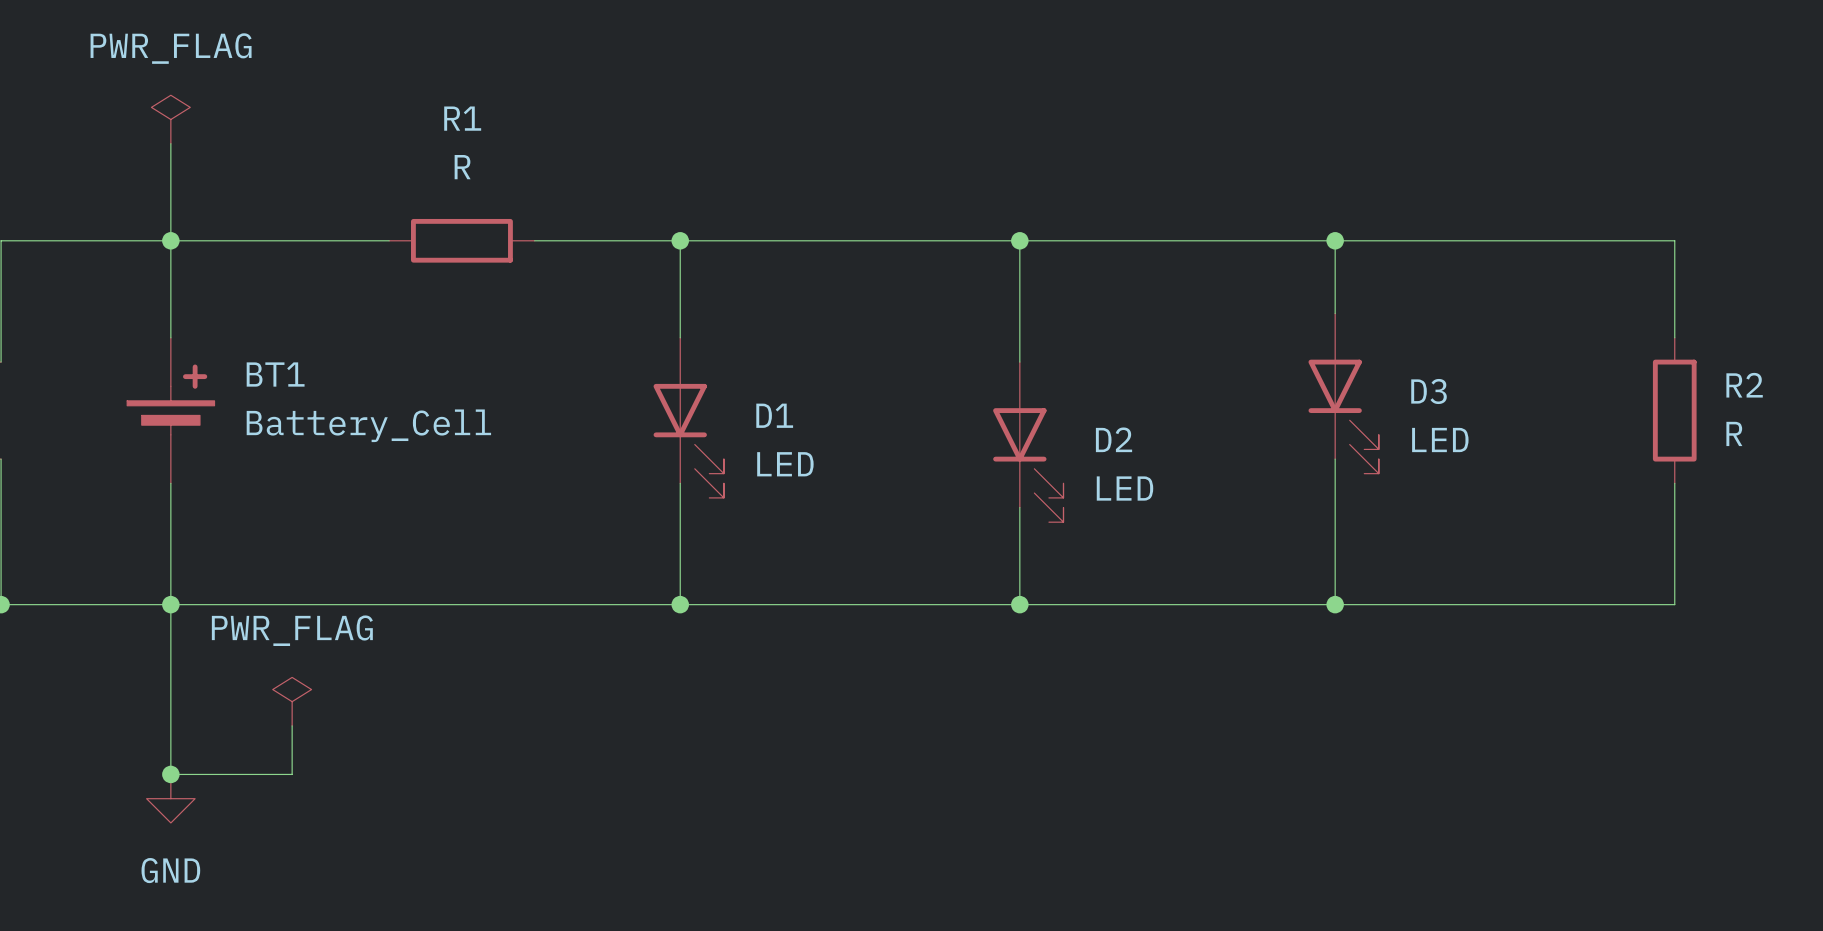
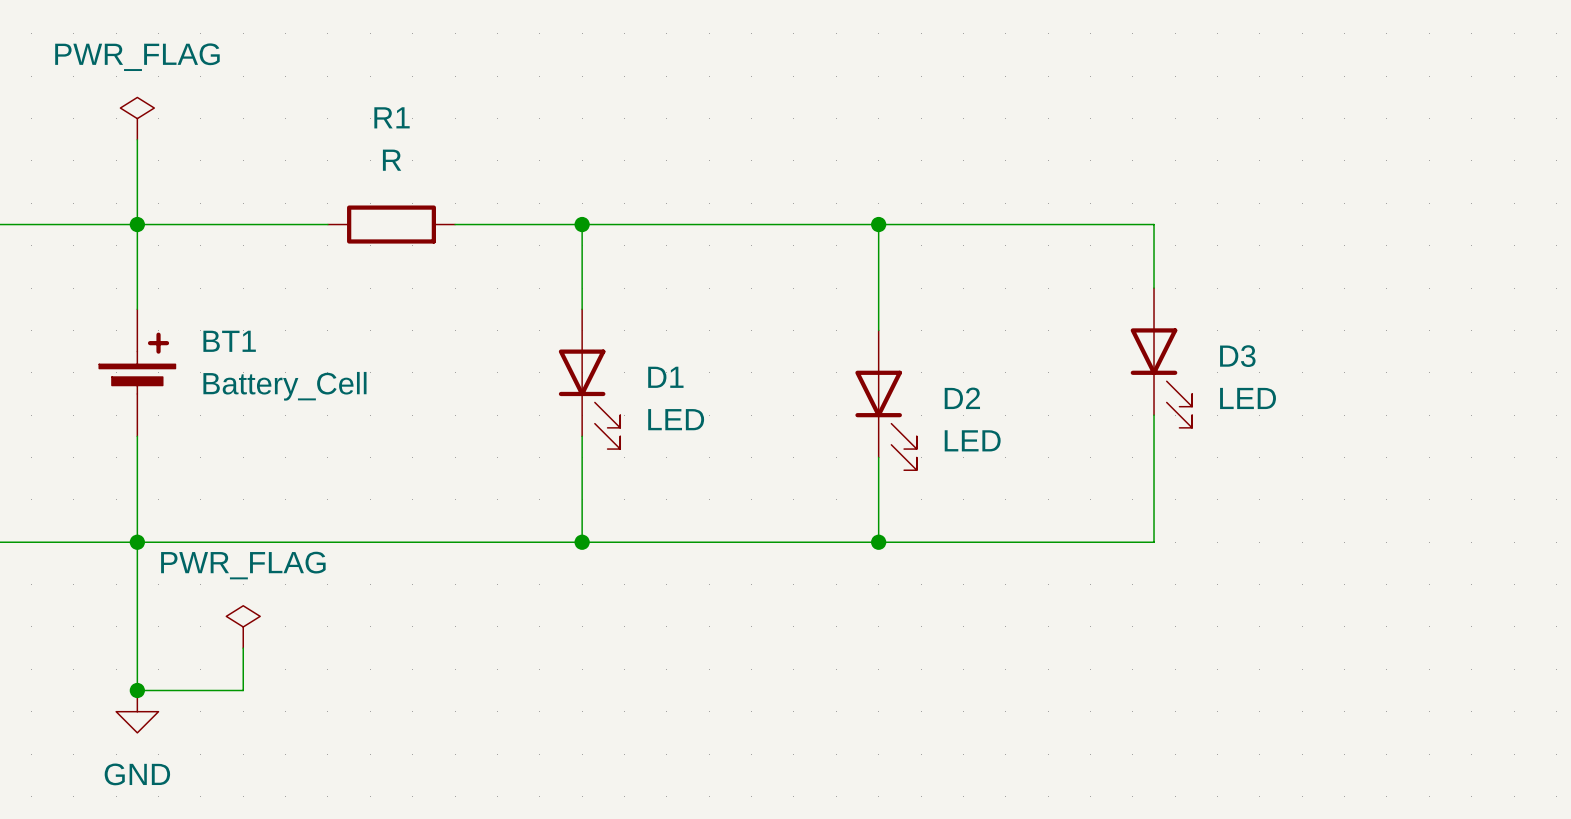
wire: (1335, 240) (1674, 240) (1674, 337) -> none
junction: (1335, 240) -> none
R2: R (1674, 410) -> none
wire: (1674, 483) (1674, 604) (1335, 604) -> none
junction: (1335, 604) -> none

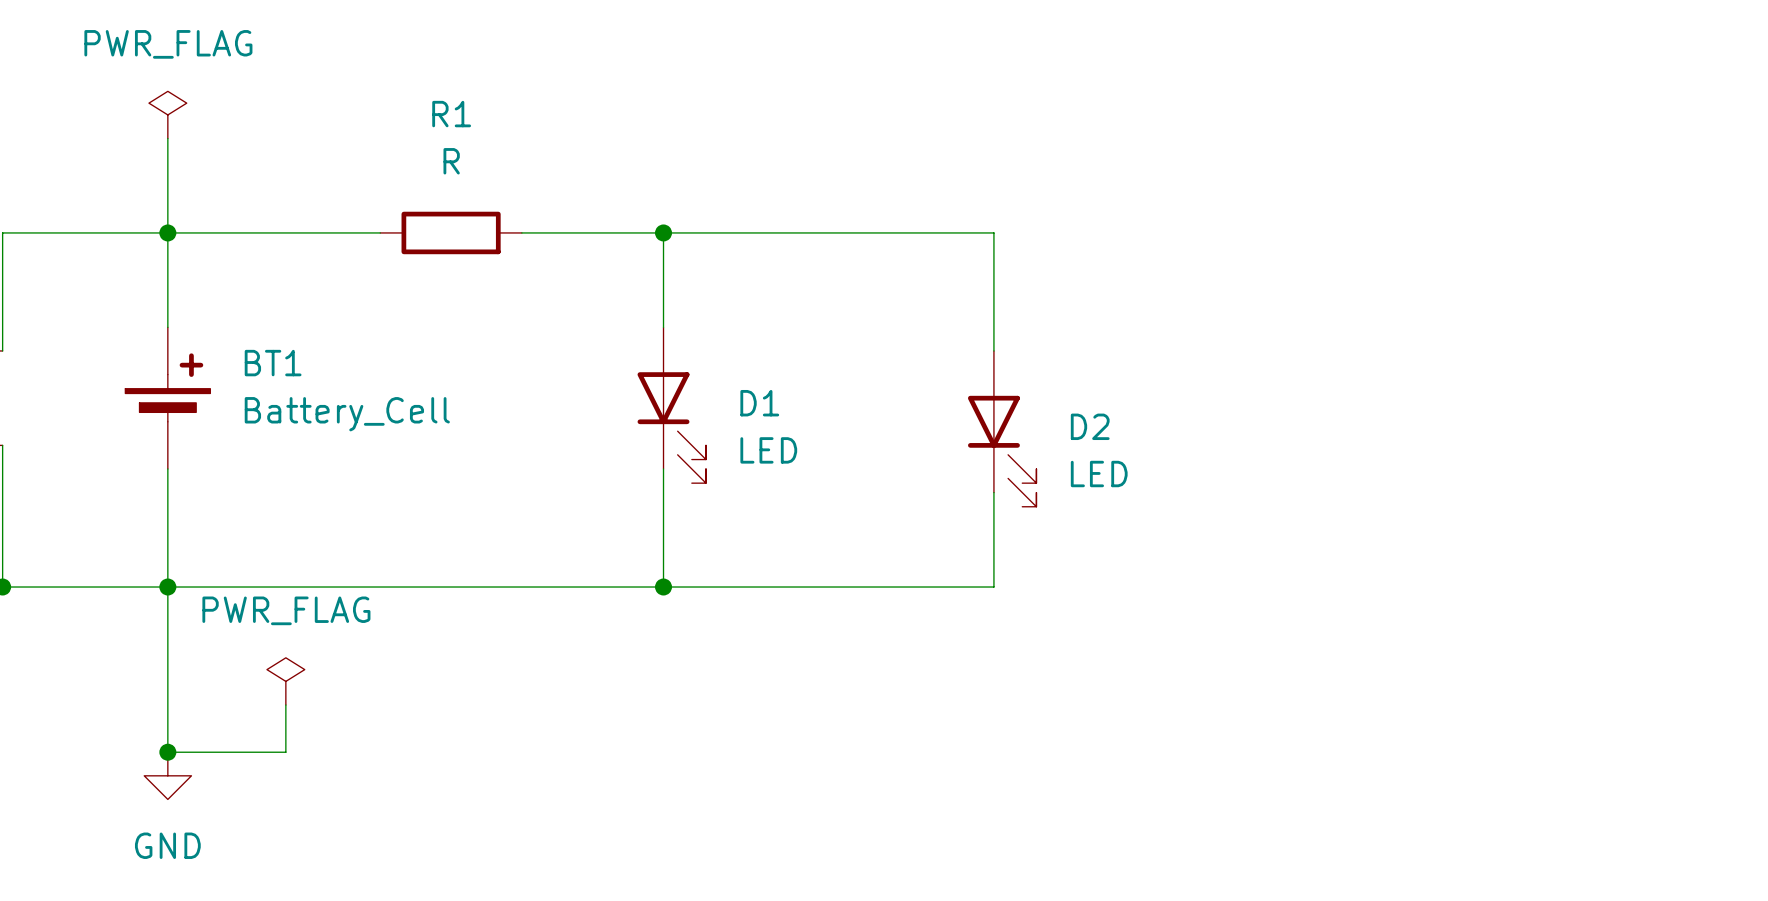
wire: (878, 224) (1154, 224) (1154, 288) -> none
junction: (878, 224) -> none
D3: LED (1161, 357) -> none
wire: (1154, 415) (1154, 542) (878, 542) -> none
junction: (878, 542) -> none

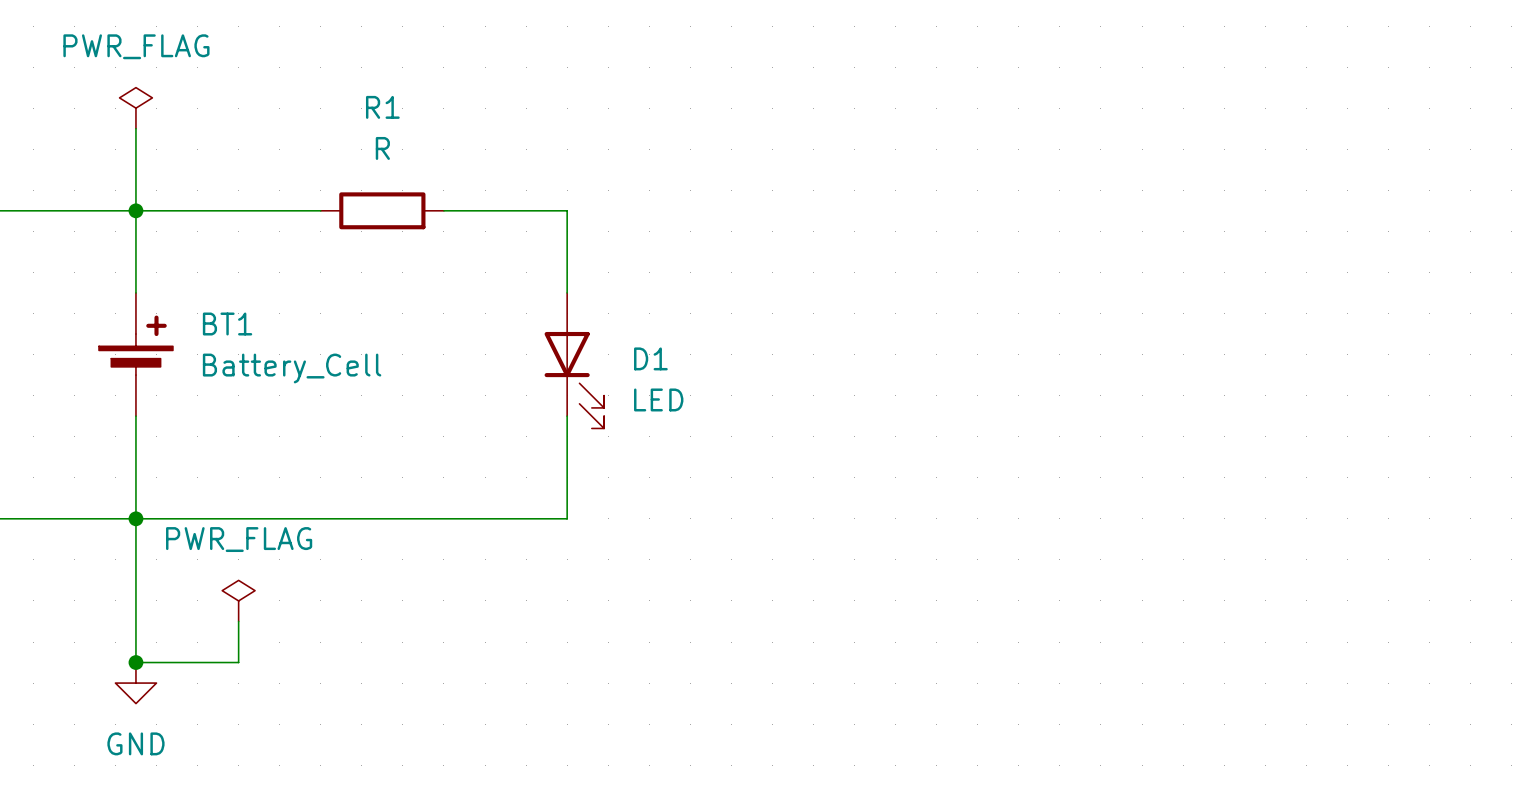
wire: (663, 232) (993, 232) (993, 350) -> none
junction: (663, 232) -> none
D2: LED (1002, 428) -> none
wire: (993, 492) (993, 587) (663, 587) -> none
junction: (663, 587) -> none

